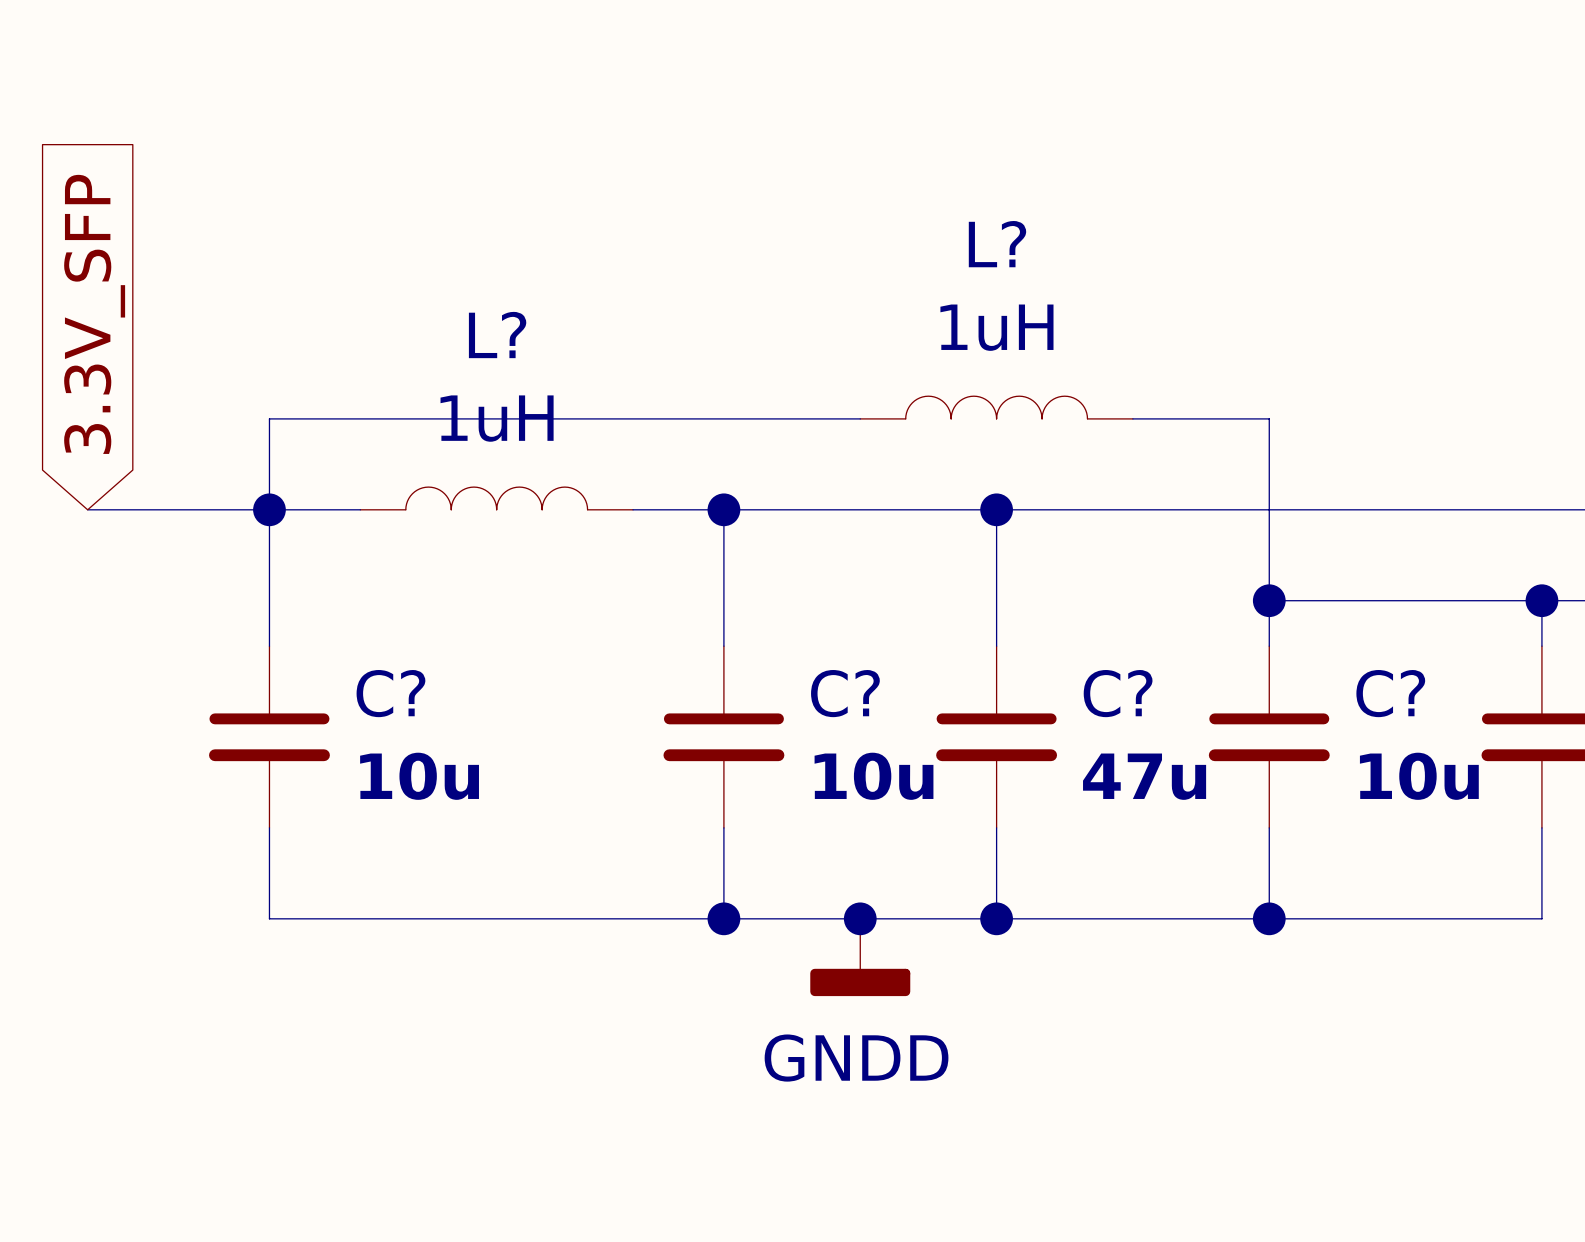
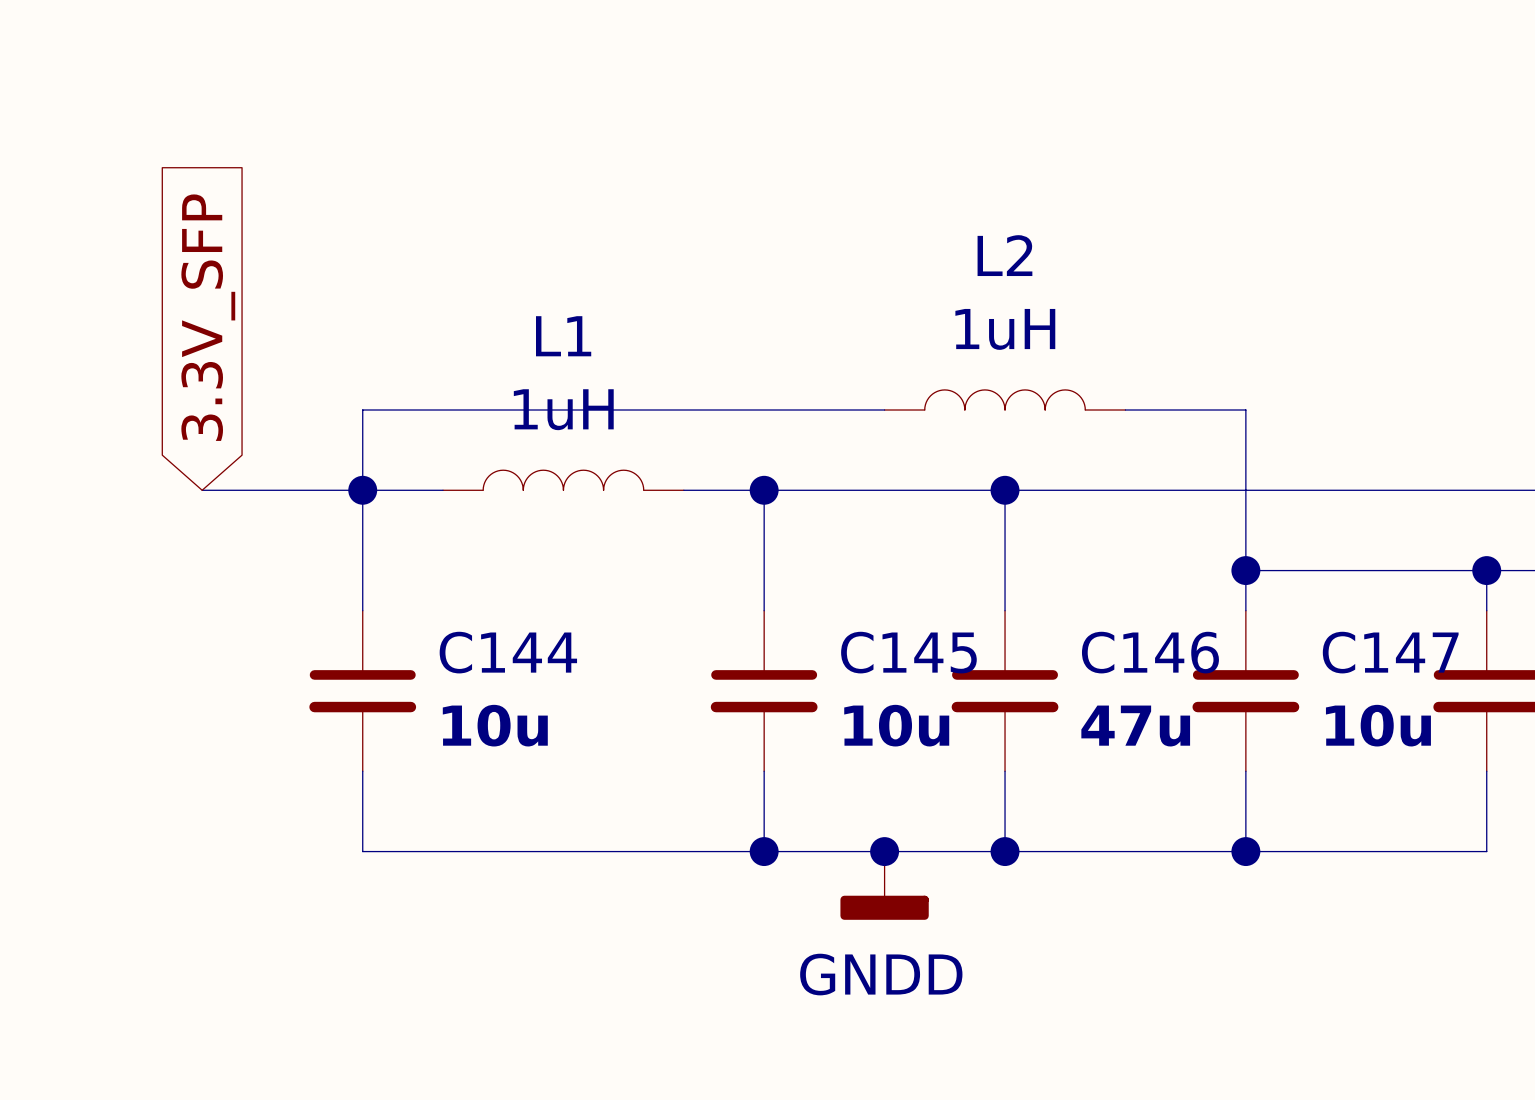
L? name: L? (997, 244) -> L2 (1004, 255)
L? name: L? (497, 335) -> L1 (563, 336)
C? name: C? (390, 693) -> C144 (508, 652)
C? name: C? (845, 693) -> C145 (908, 652)
C? name: C? (1118, 693) -> C146 (1150, 652)
C? name: C? (1390, 693) -> C147 (1390, 652)

